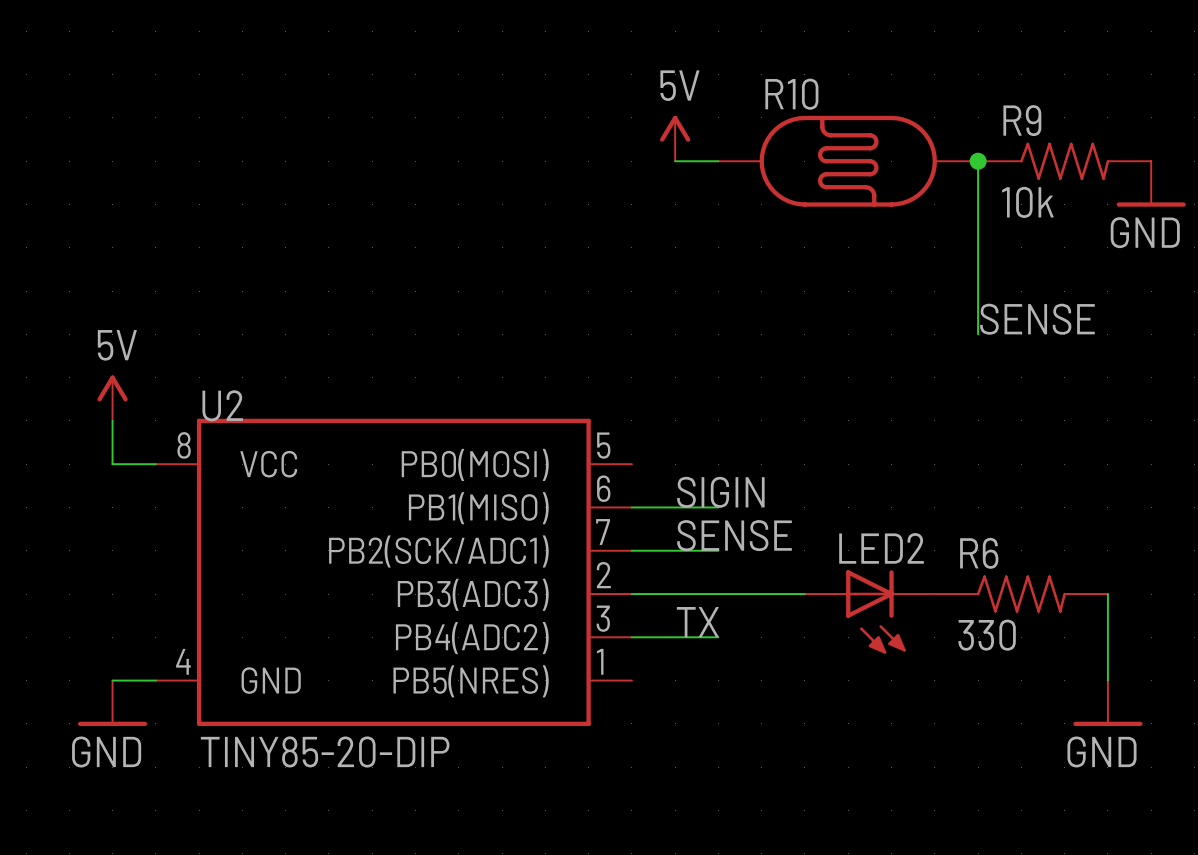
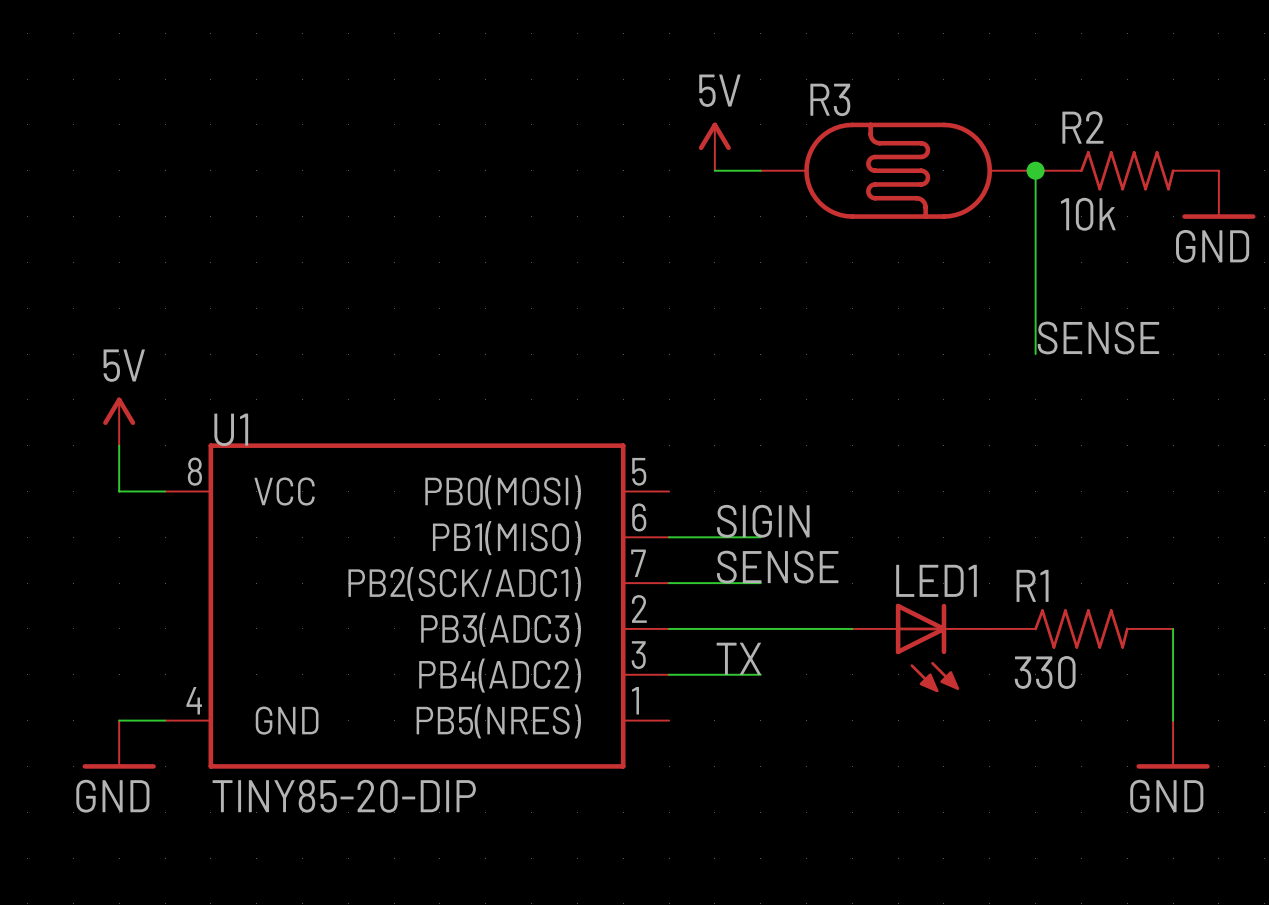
R10 name: R10 (791, 94) -> R3 (830, 99)
R9 name: R9 (1022, 120) -> R2 (1082, 127)
U2 name: U2 (222, 405) -> U1 (231, 429)
LED2 name: LED2 (881, 548) -> LED1 (936, 580)
R6 name: R6 (979, 553) -> R1 (1032, 585)

